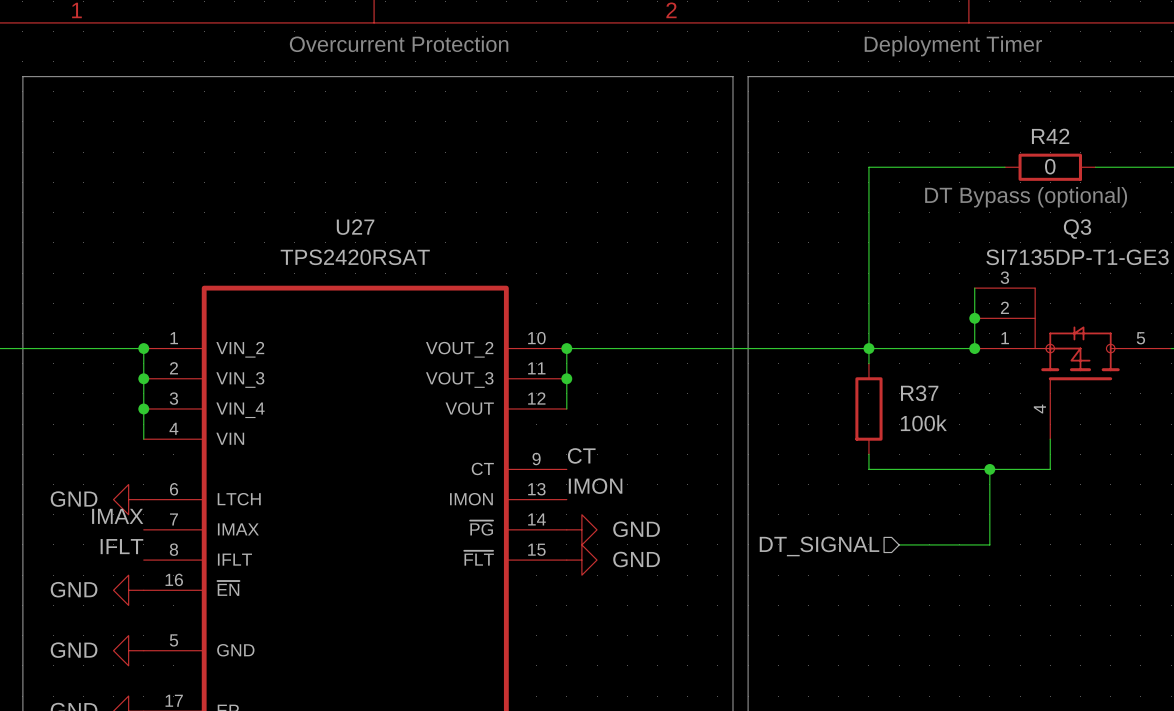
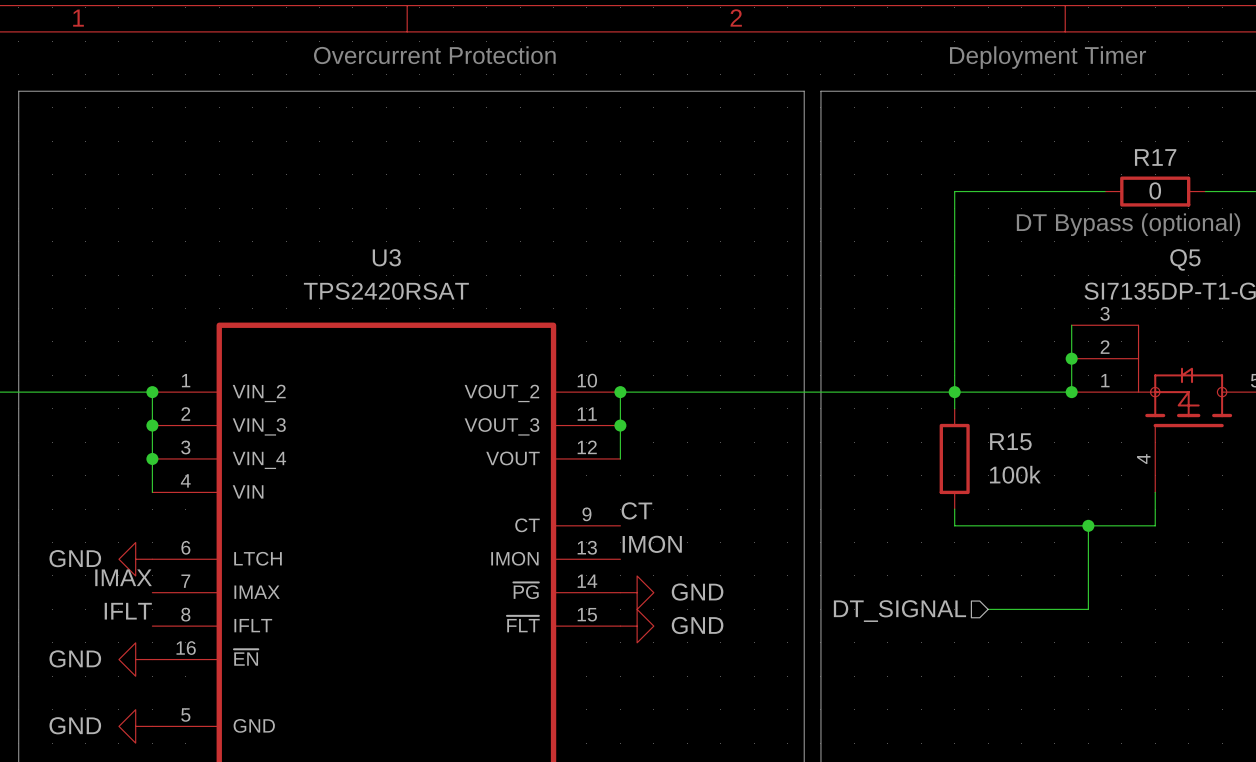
R42 name: R42 (1050, 136) -> R17 (1155, 157)
U27 name: U27 (355, 227) -> U3 (386, 257)
Q3 name: Q3 (1077, 229) -> Q5 (1185, 259)
R37 name: R37 (919, 393) -> R15 (1010, 441)

